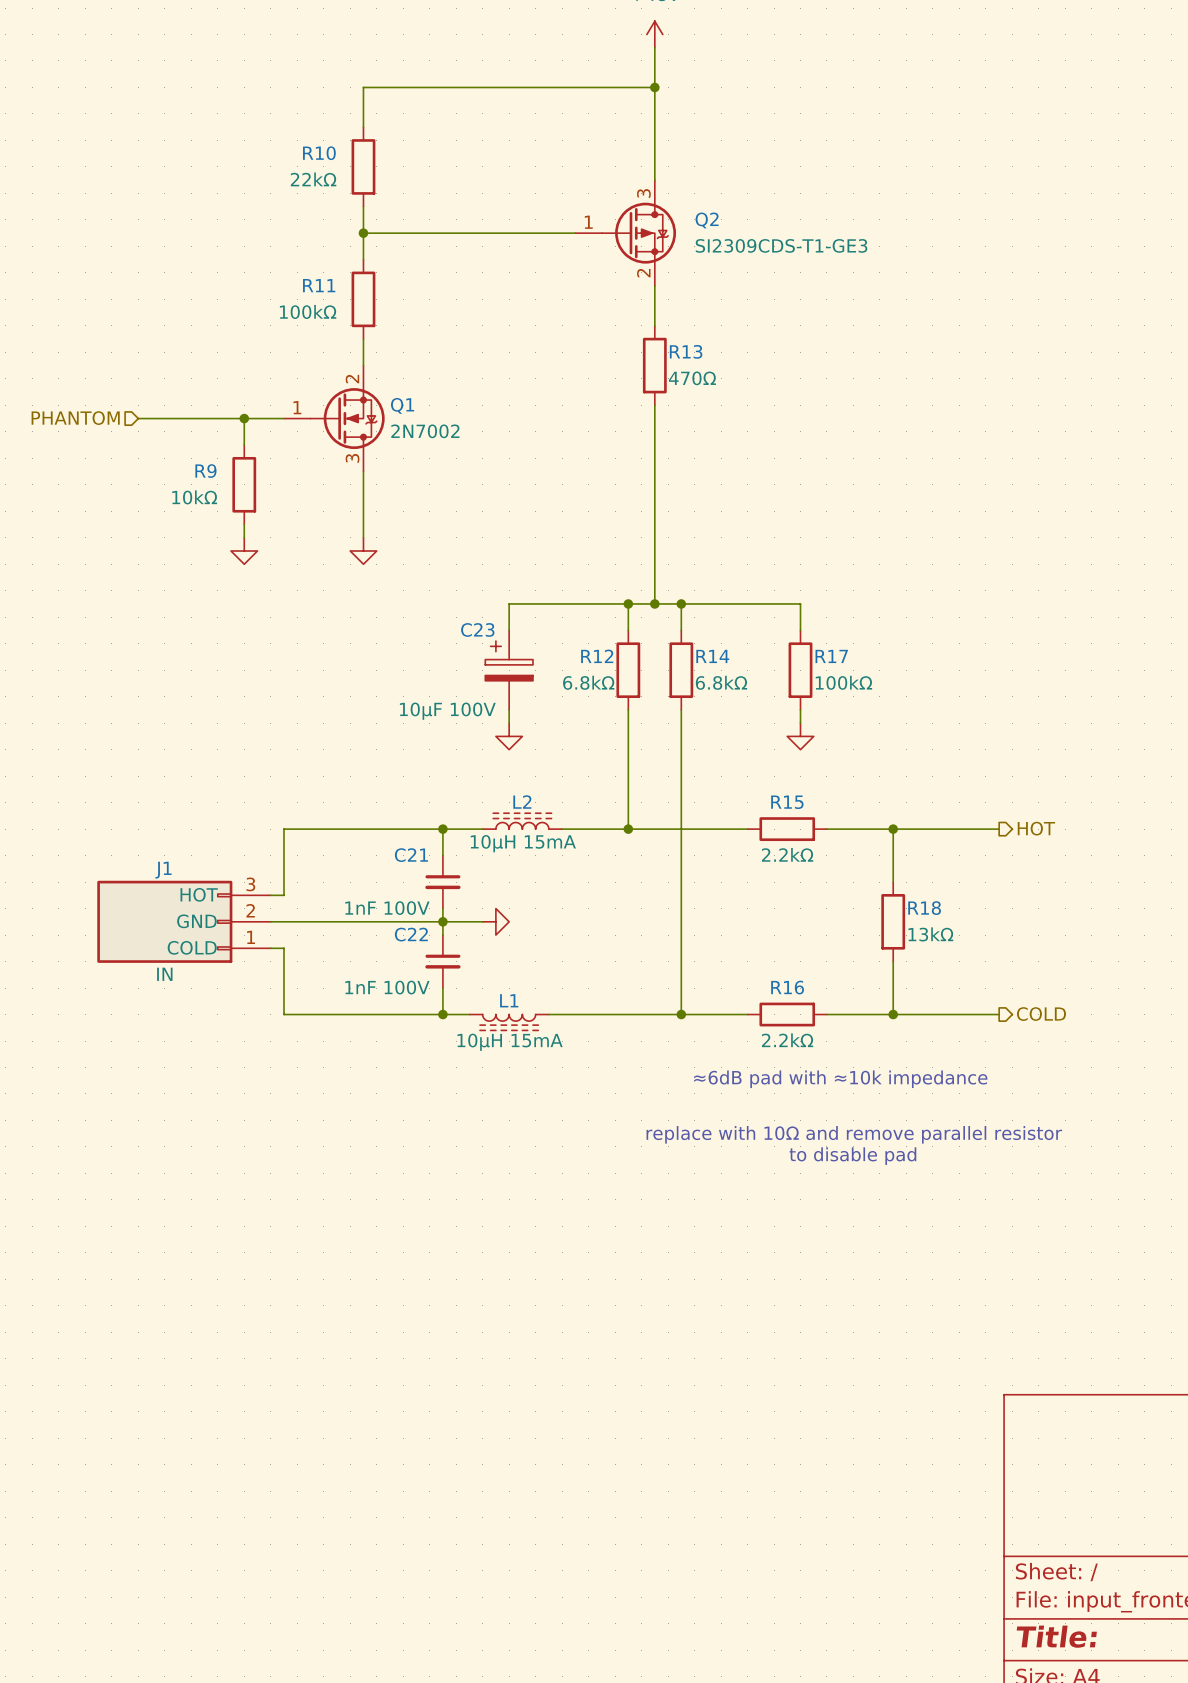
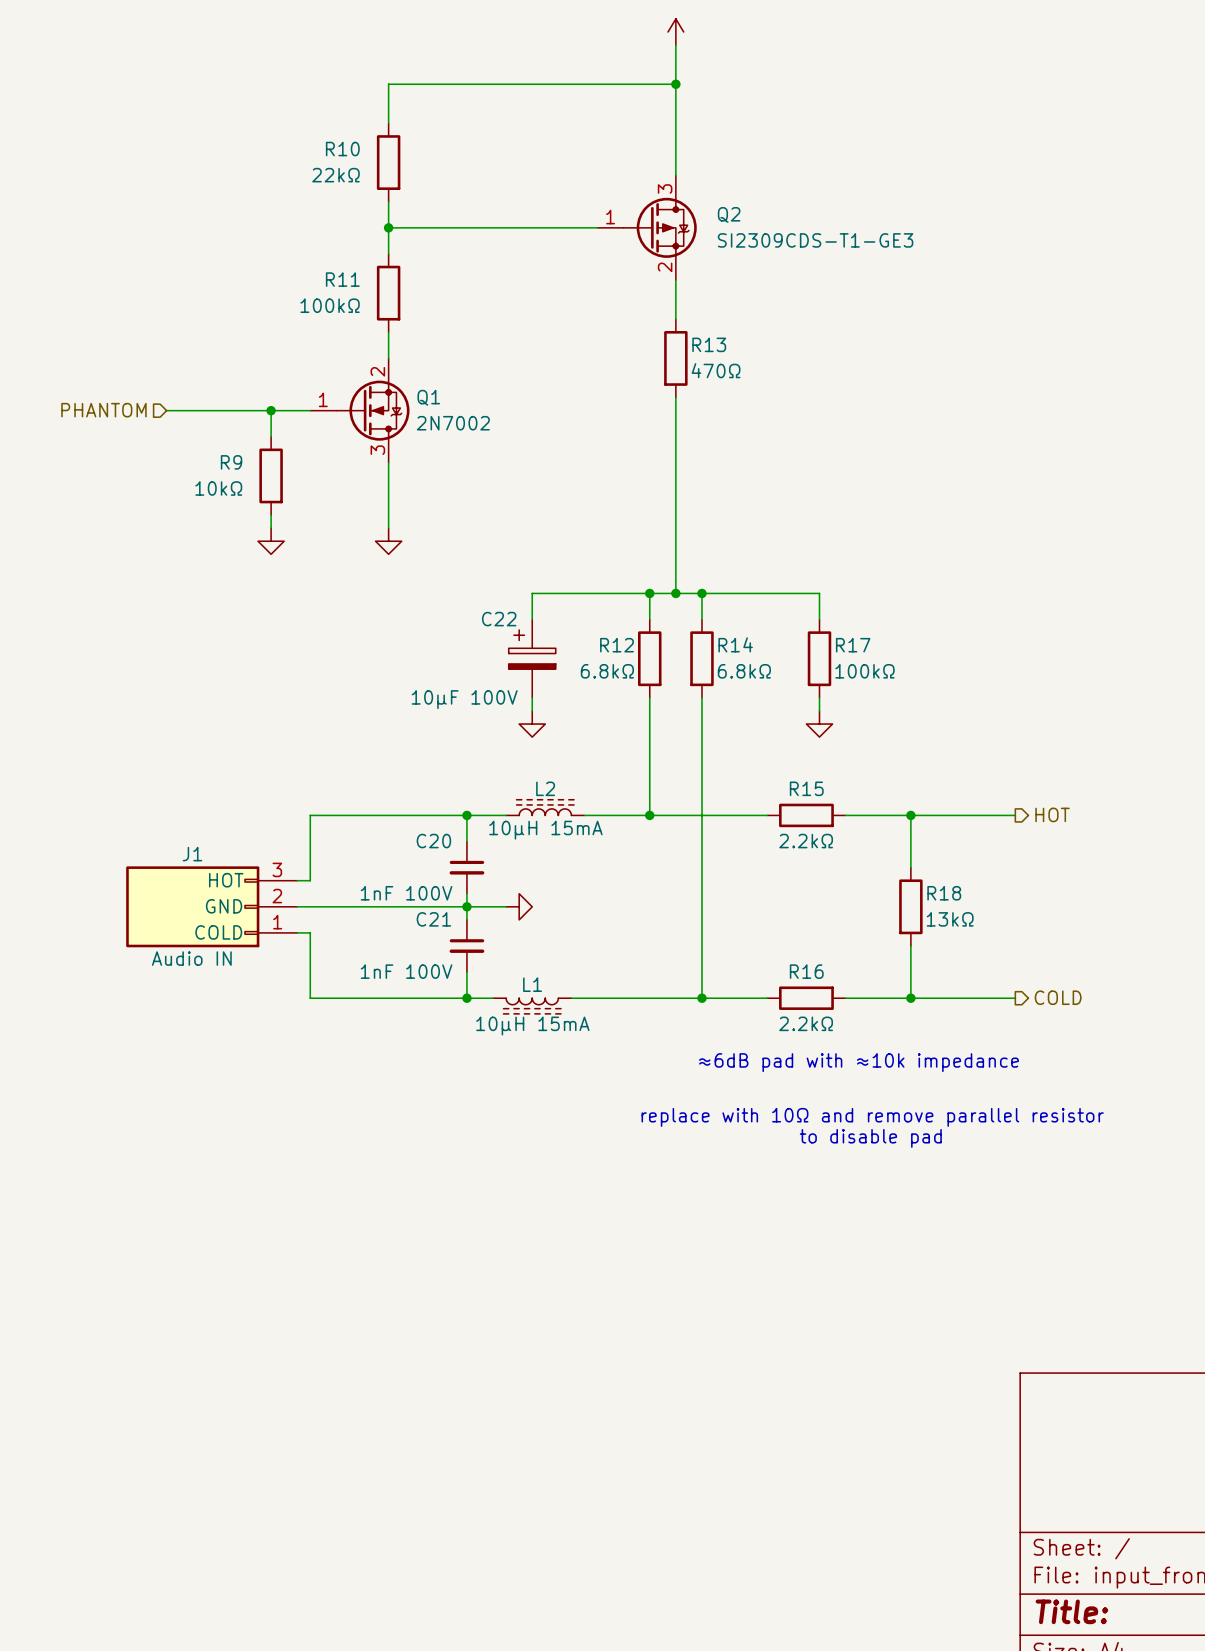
C23 name: C23 (477, 629) -> C22 (499, 619)
C21 name: C21 (411, 855) -> C20 (433, 841)
C22 name: C22 (411, 934) -> C21 (433, 919)
J1 text: IN (164, 974) -> Audio IN (191, 958)

